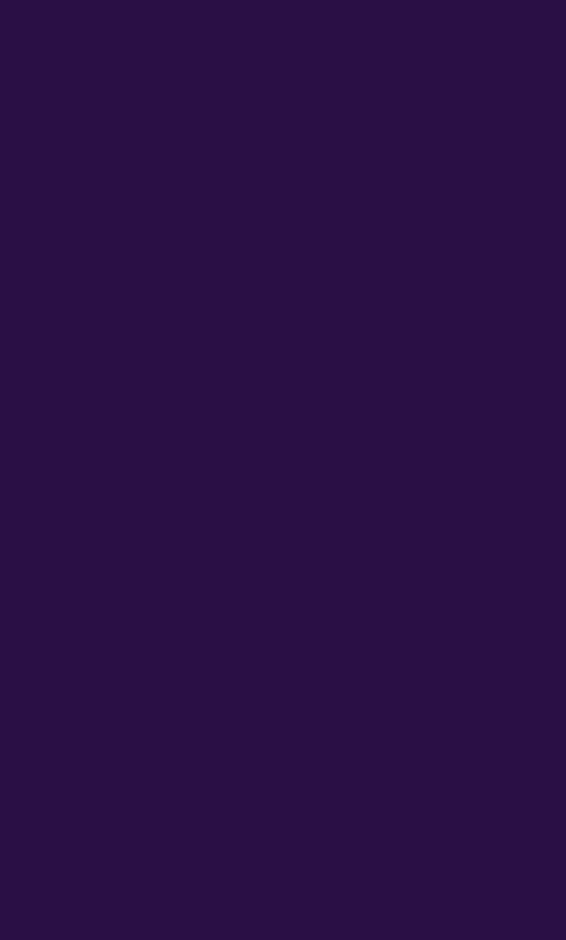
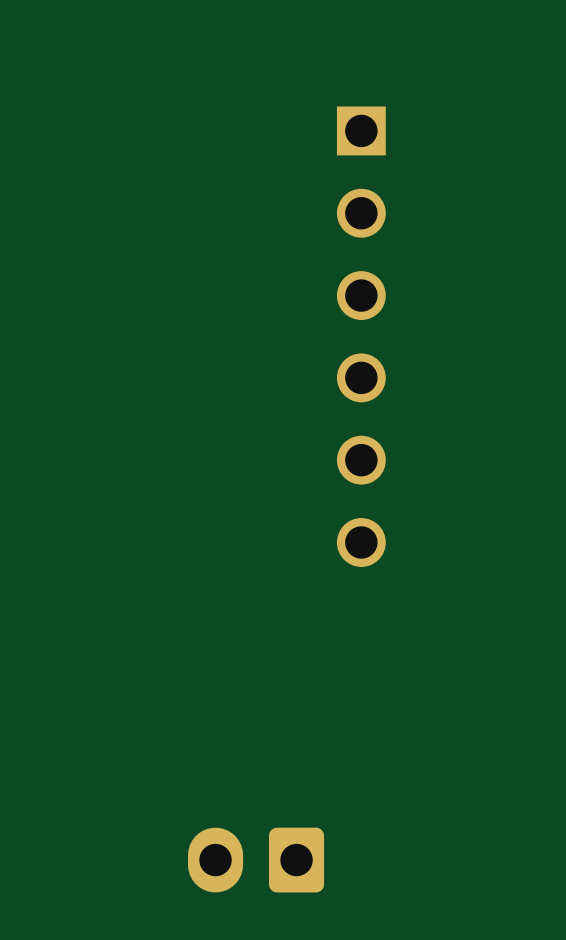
part: none -> (361, 336)
part: none -> (256, 860)

